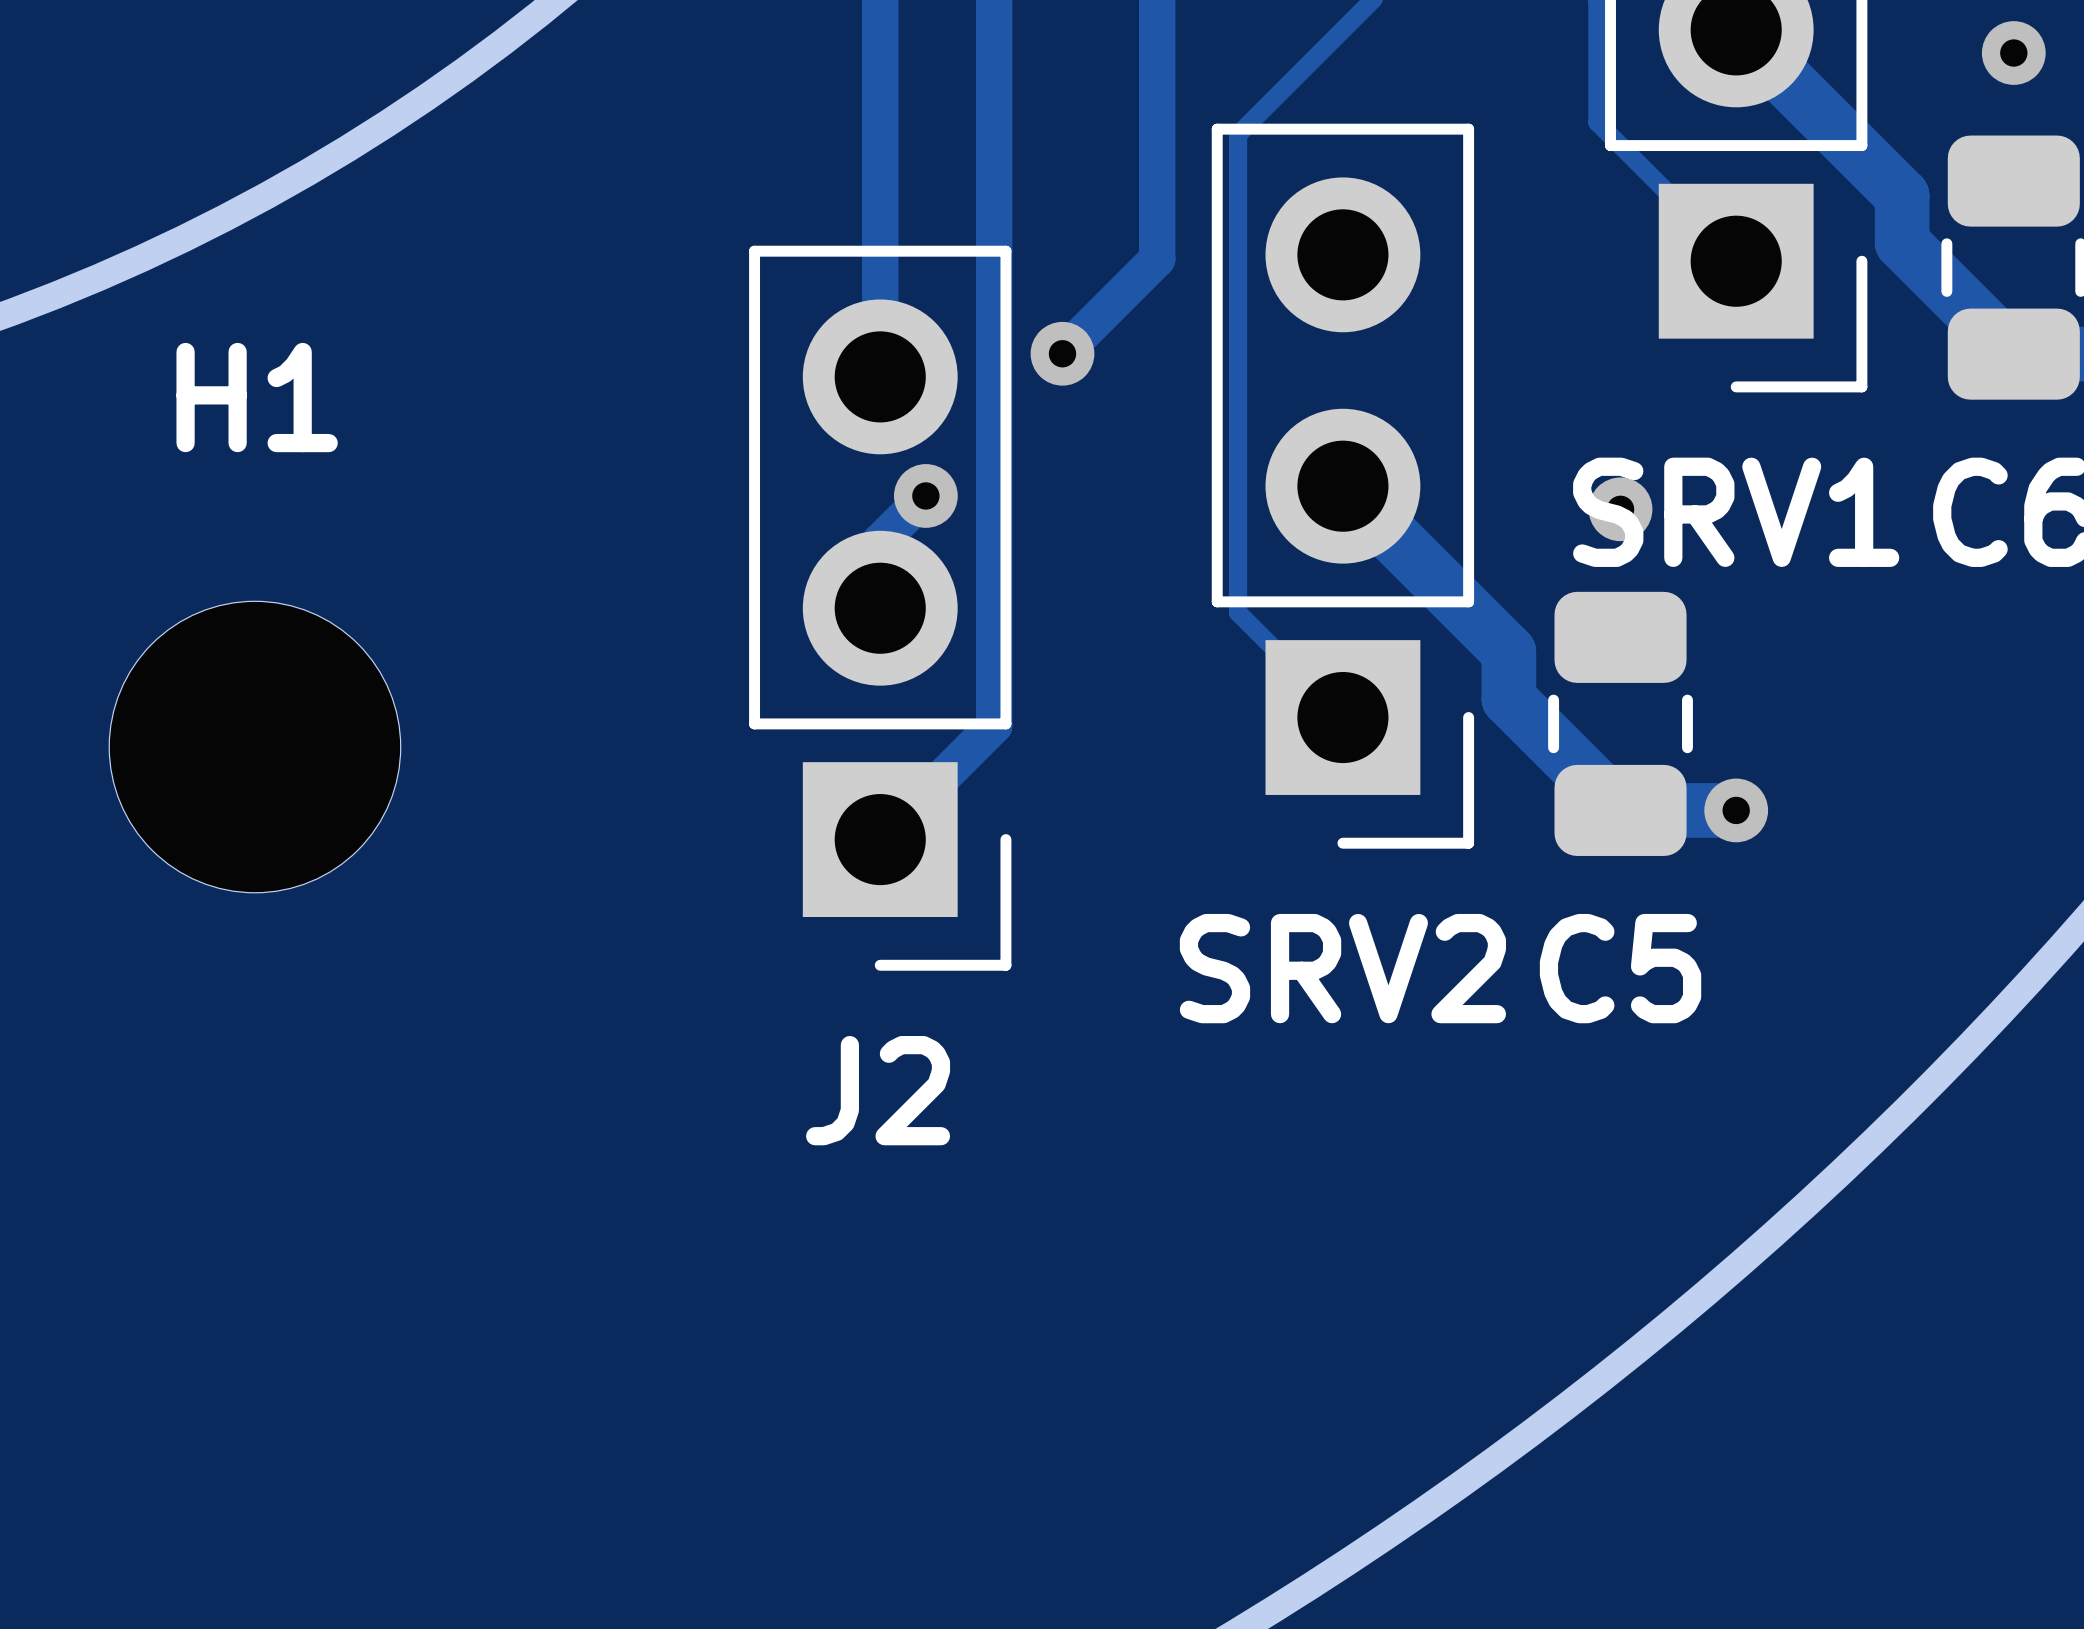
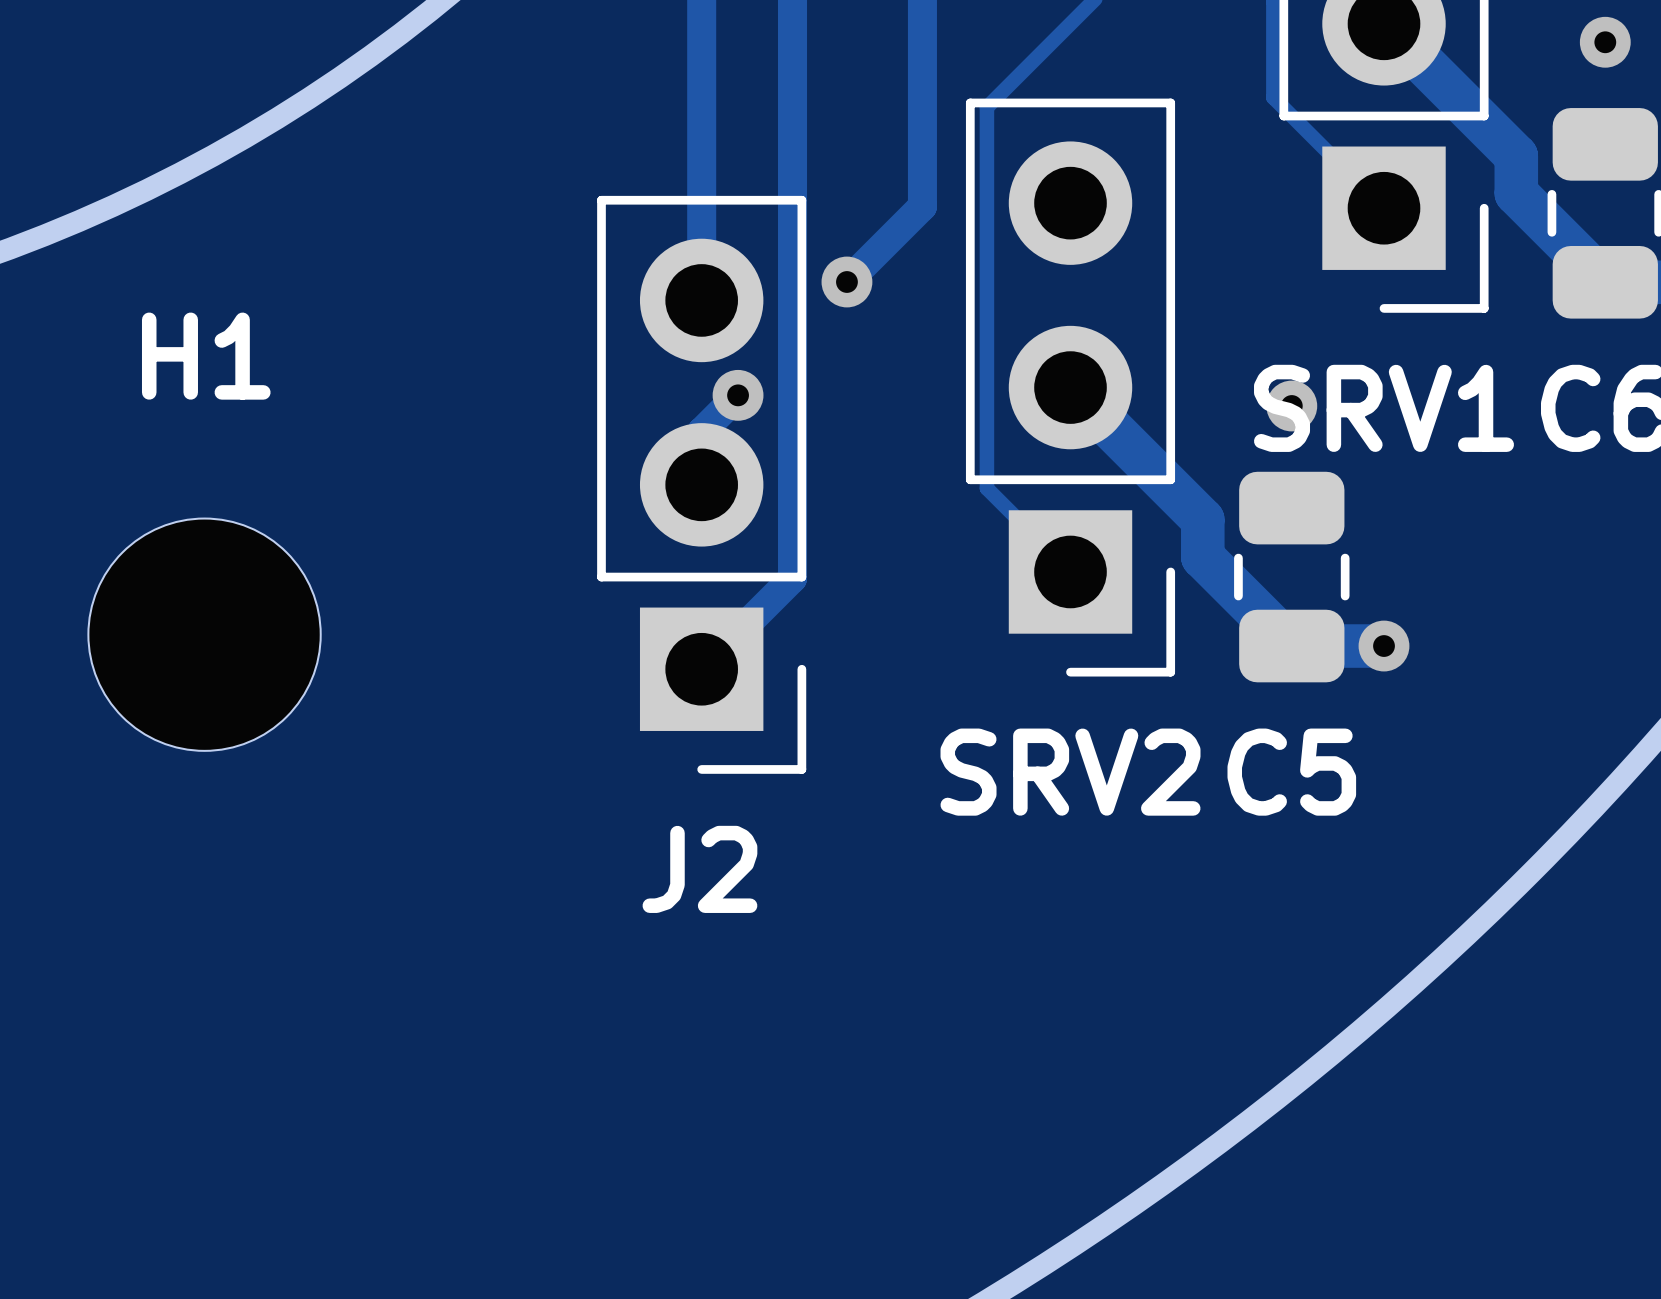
H1 position: (254, 747) -> (204, 634)

